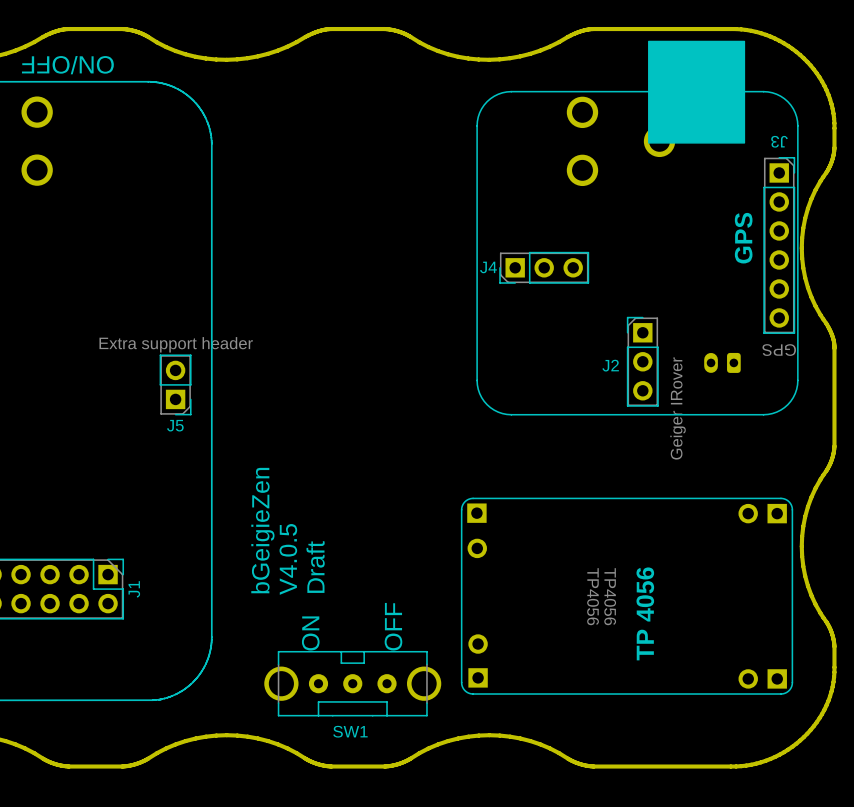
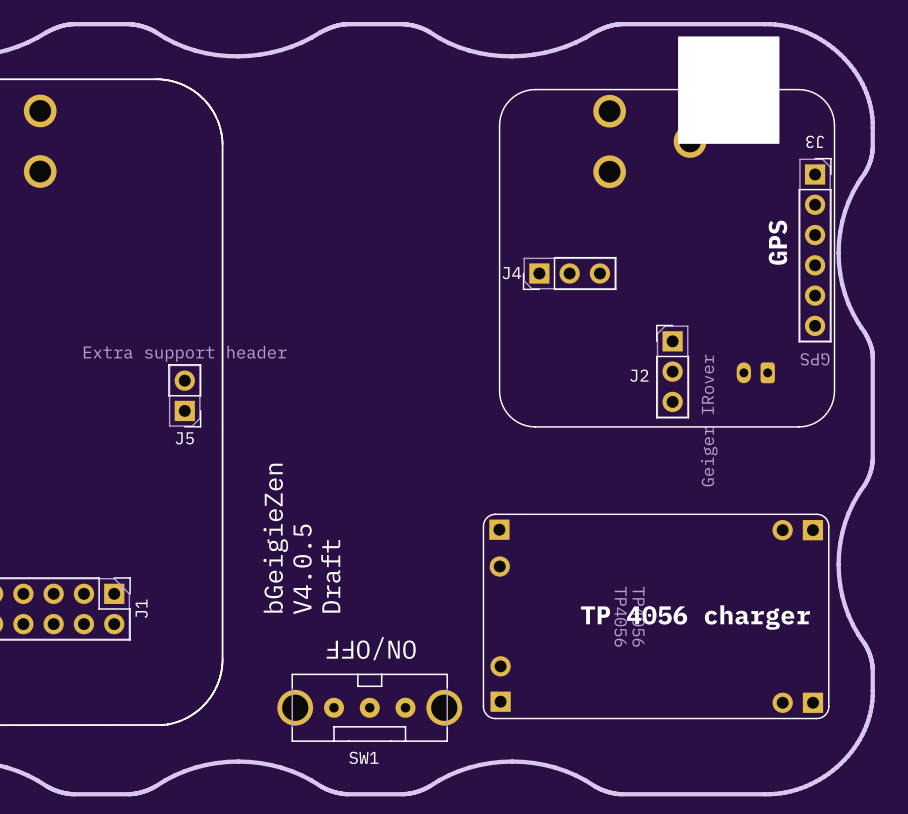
text: ON/OFF (67, 65) -> none
TP4056 text: none -> TP 4056 charger (695, 617)
TP4056 text: TP 4056 (645, 613) -> none
text: OFF (393, 626) -> ON/OFF (371, 648)
text: ON (310, 633) -> none

